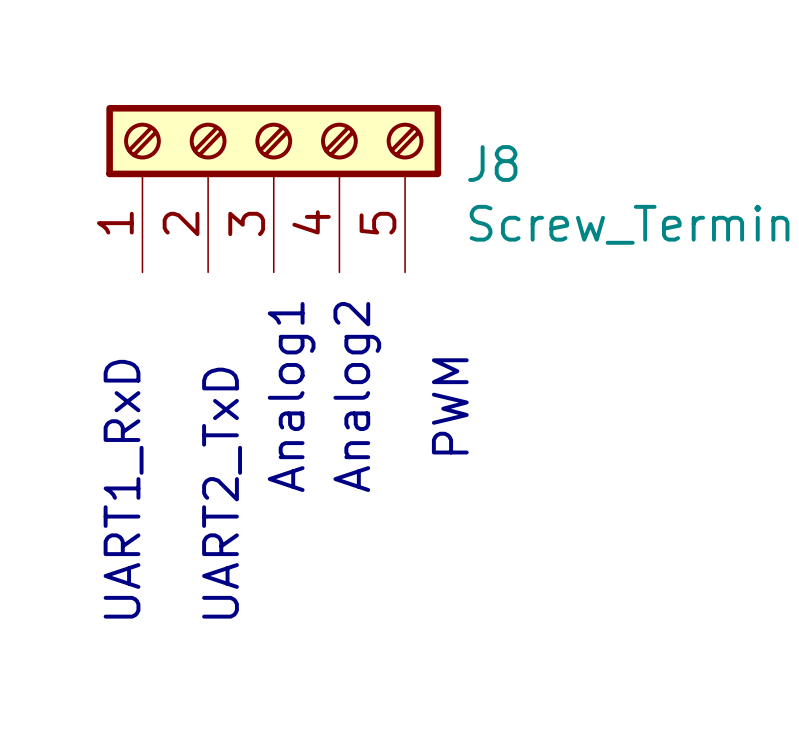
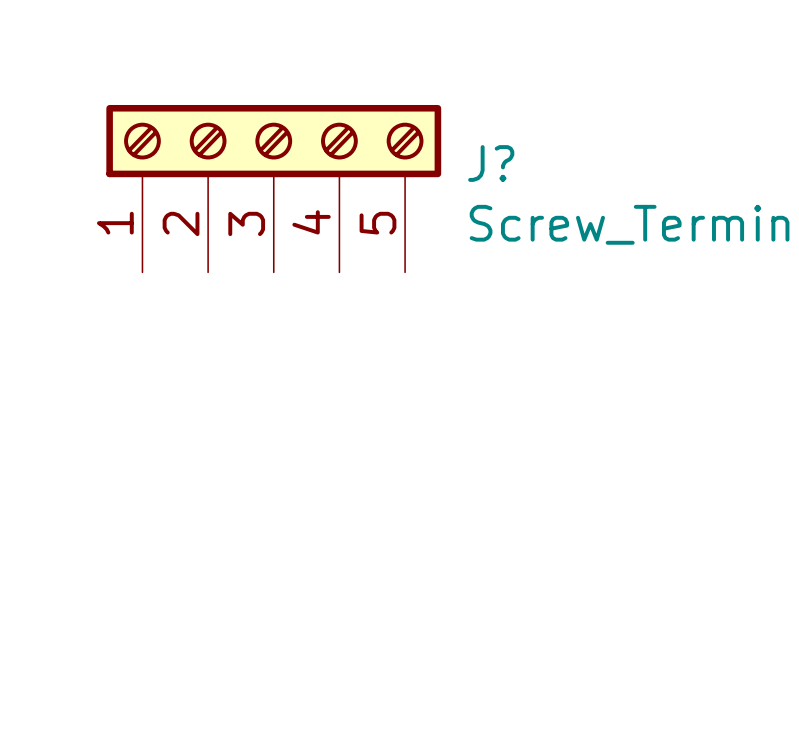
J8 name: J8 (492, 163) -> J? (491, 163)
text: Analog1 (291, 396) -> none
text: Analog2 (357, 396) -> none
text: PWM (450, 406) -> none
text: UART1_RxD (123, 489) -> none
text: UART2_TxD (222, 493) -> none

